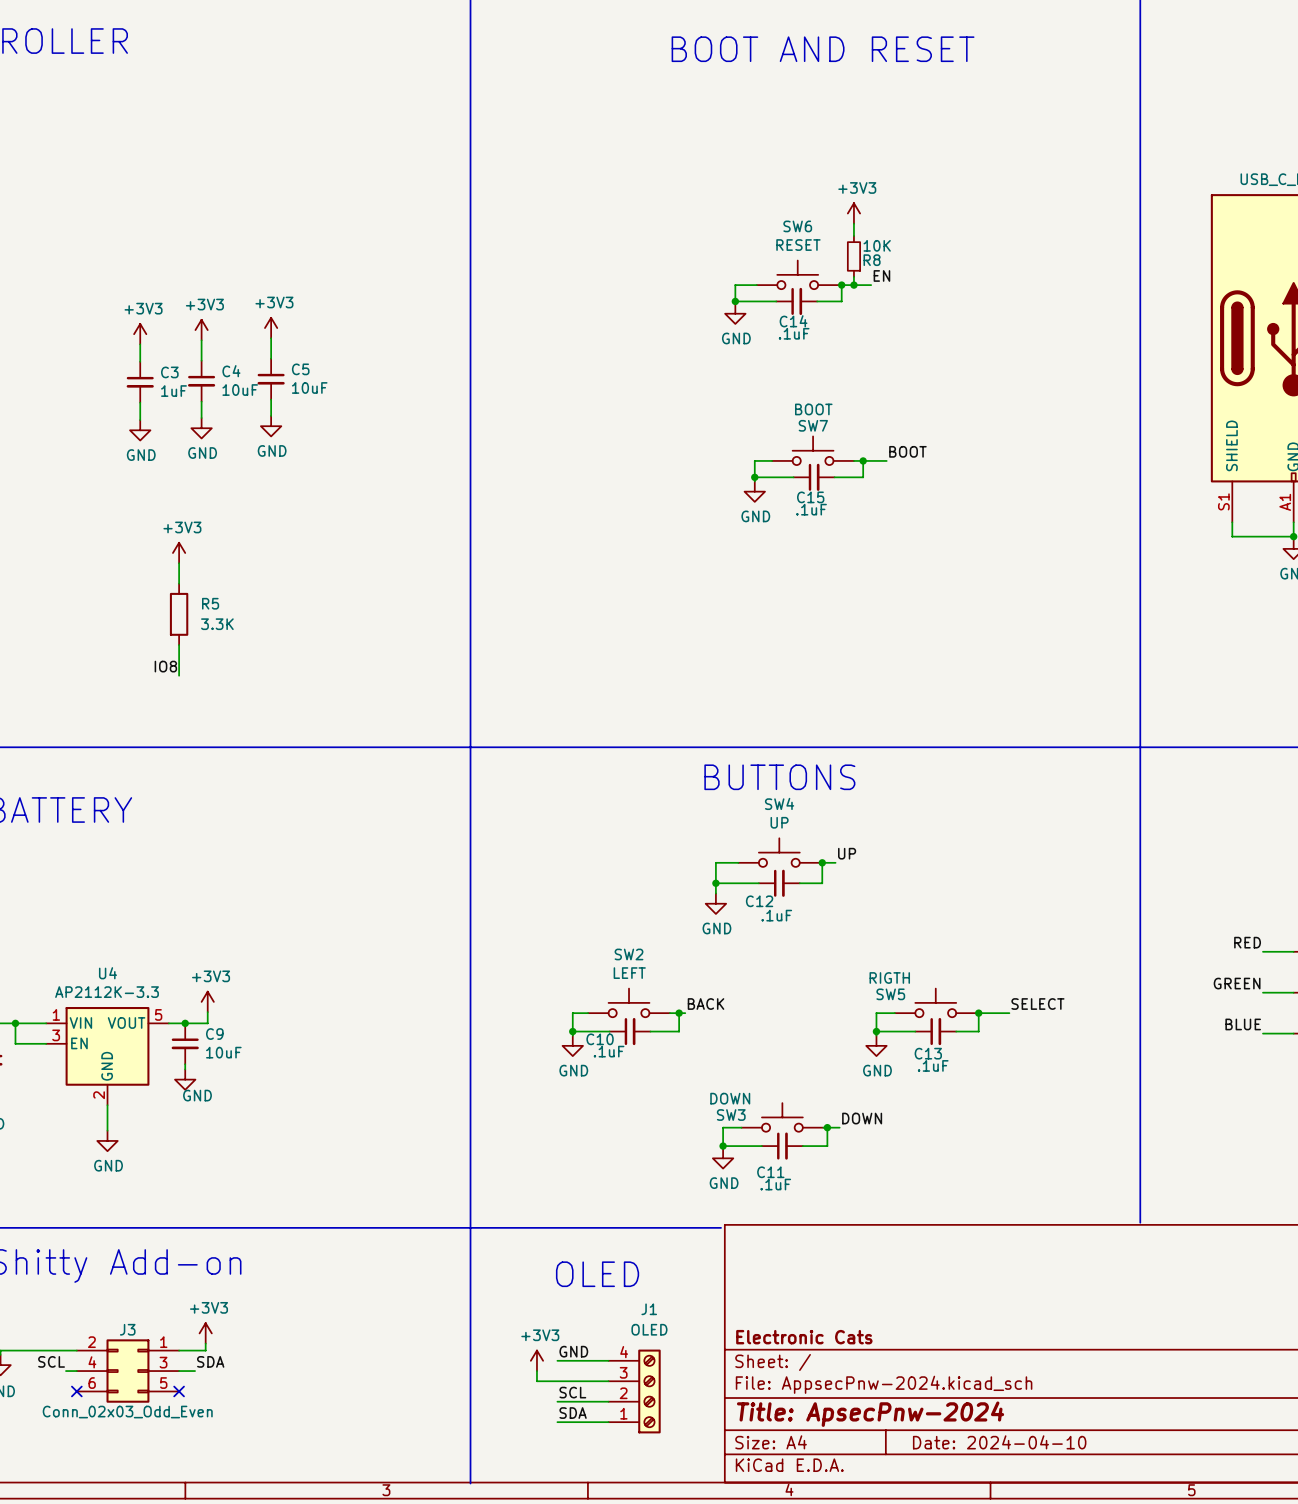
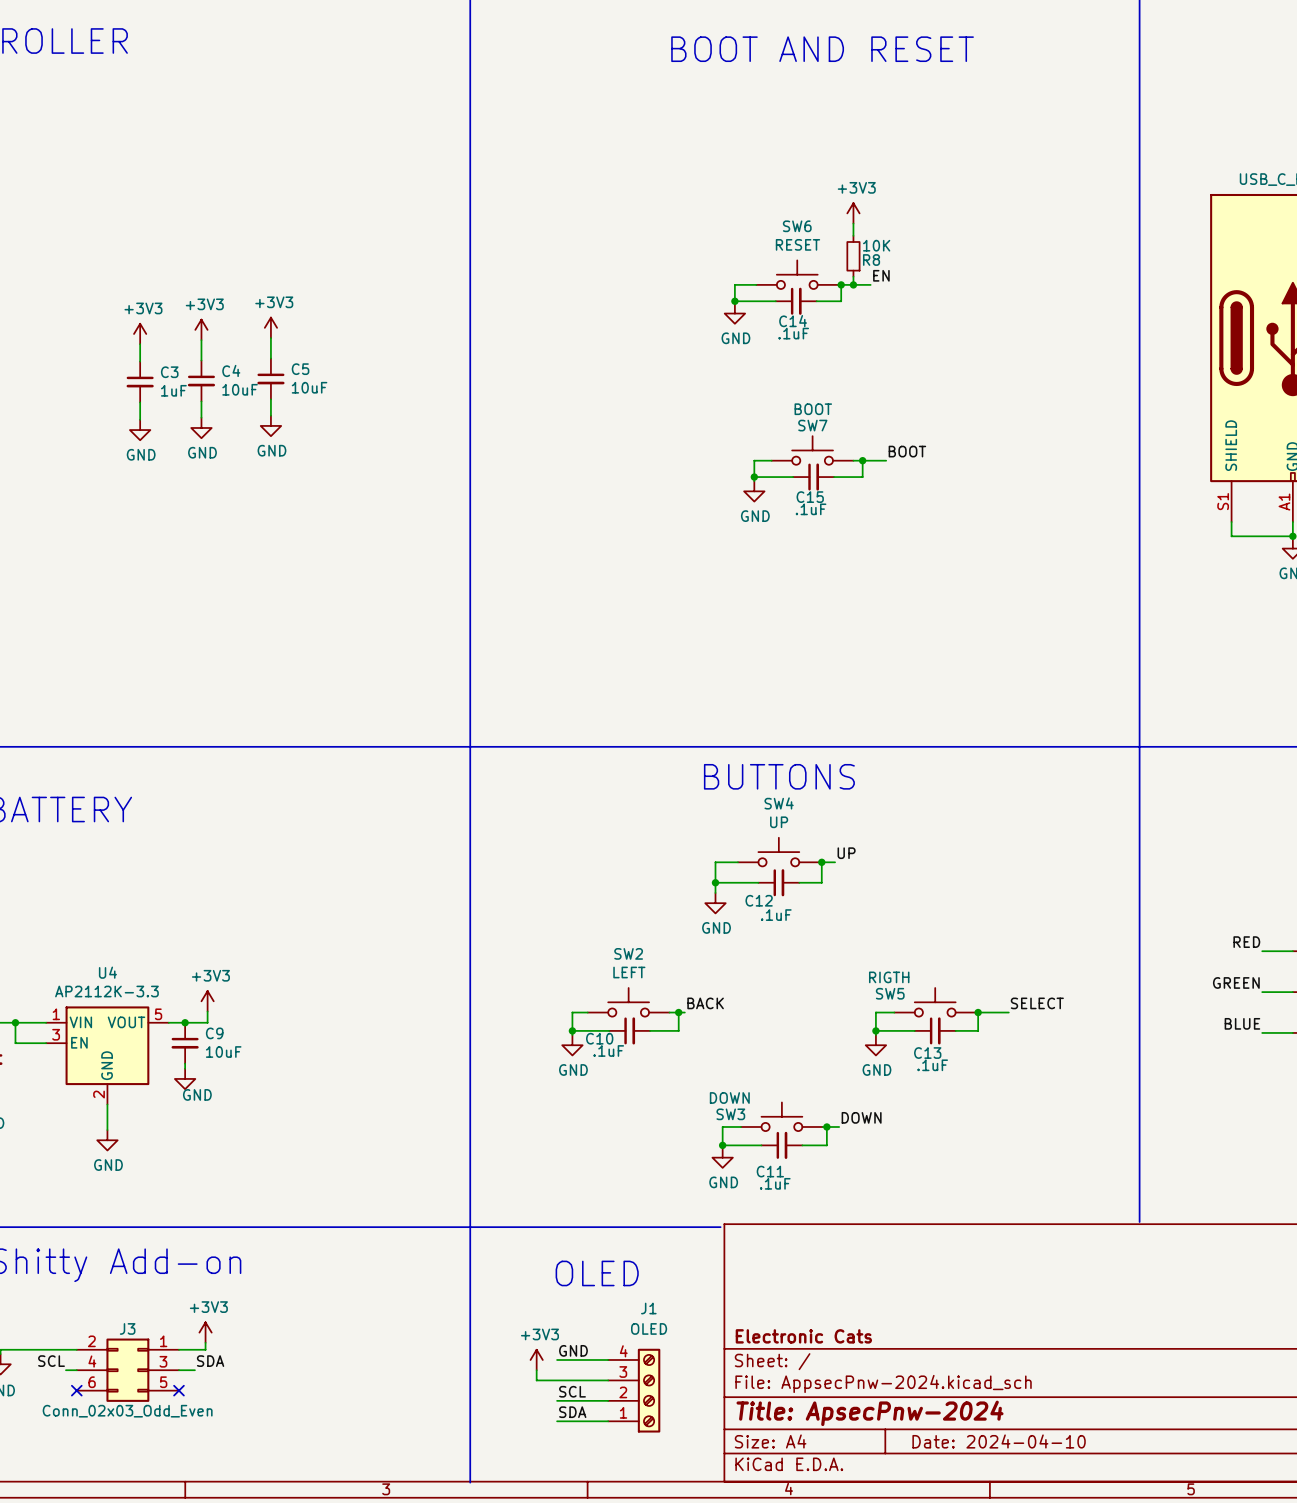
power symbol: +3V3 (179, 553) -> none
wire: (179, 563) (179, 583) -> none
R5: 3.3K (179, 614) -> none
wire: (179, 645) (179, 675) -> none
label: IO8 (165, 666) -> none

